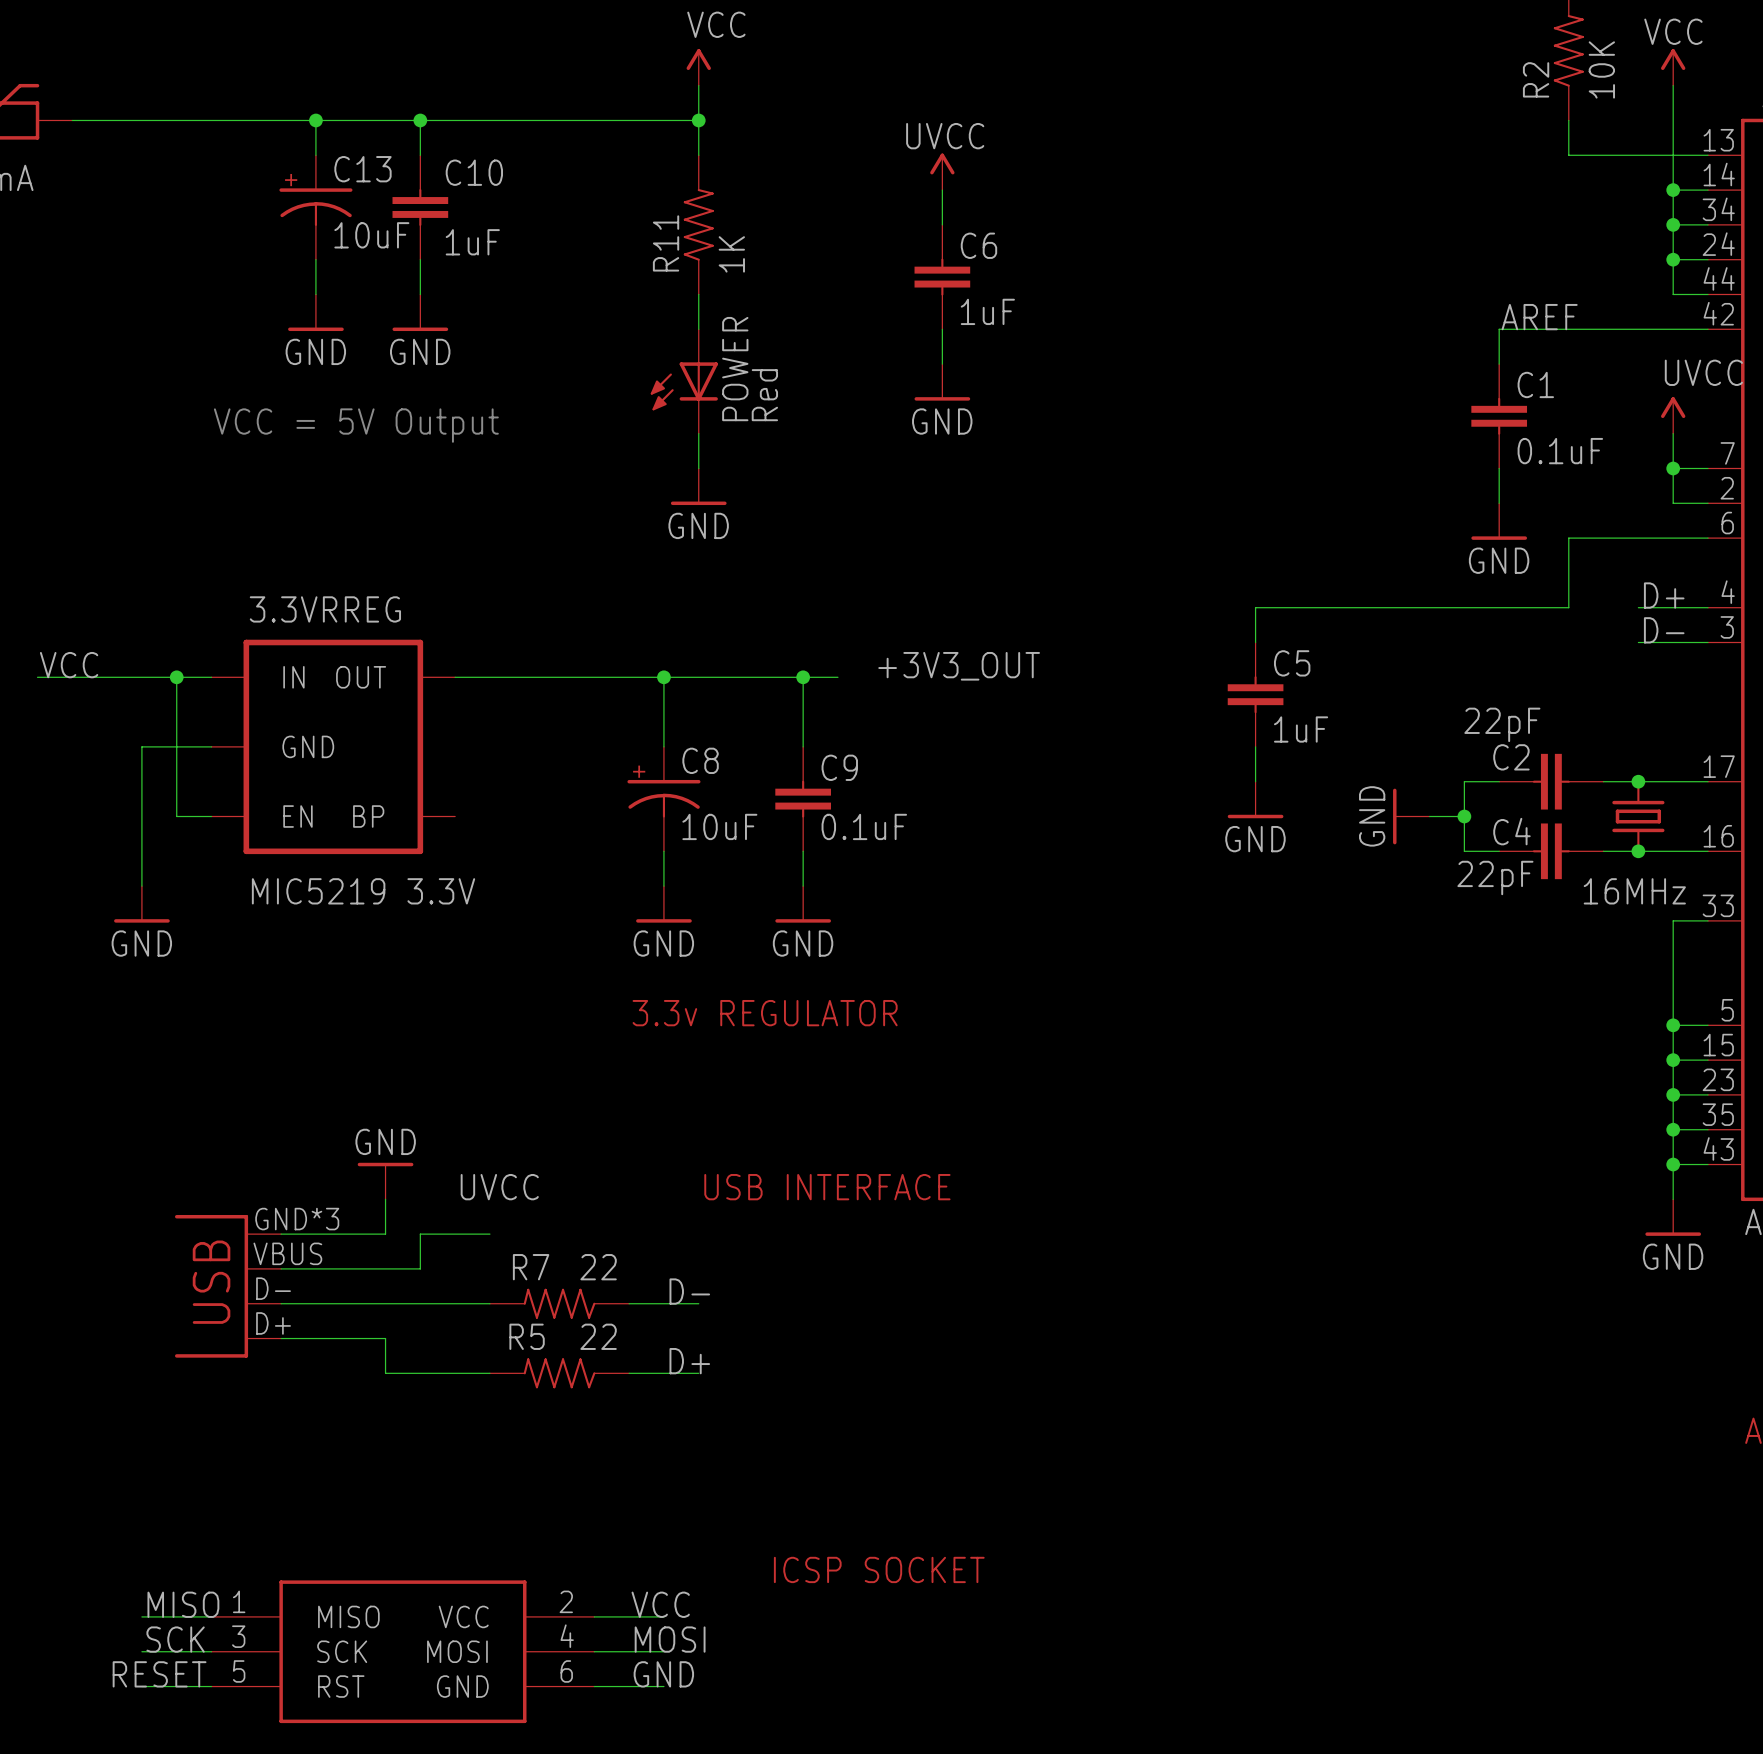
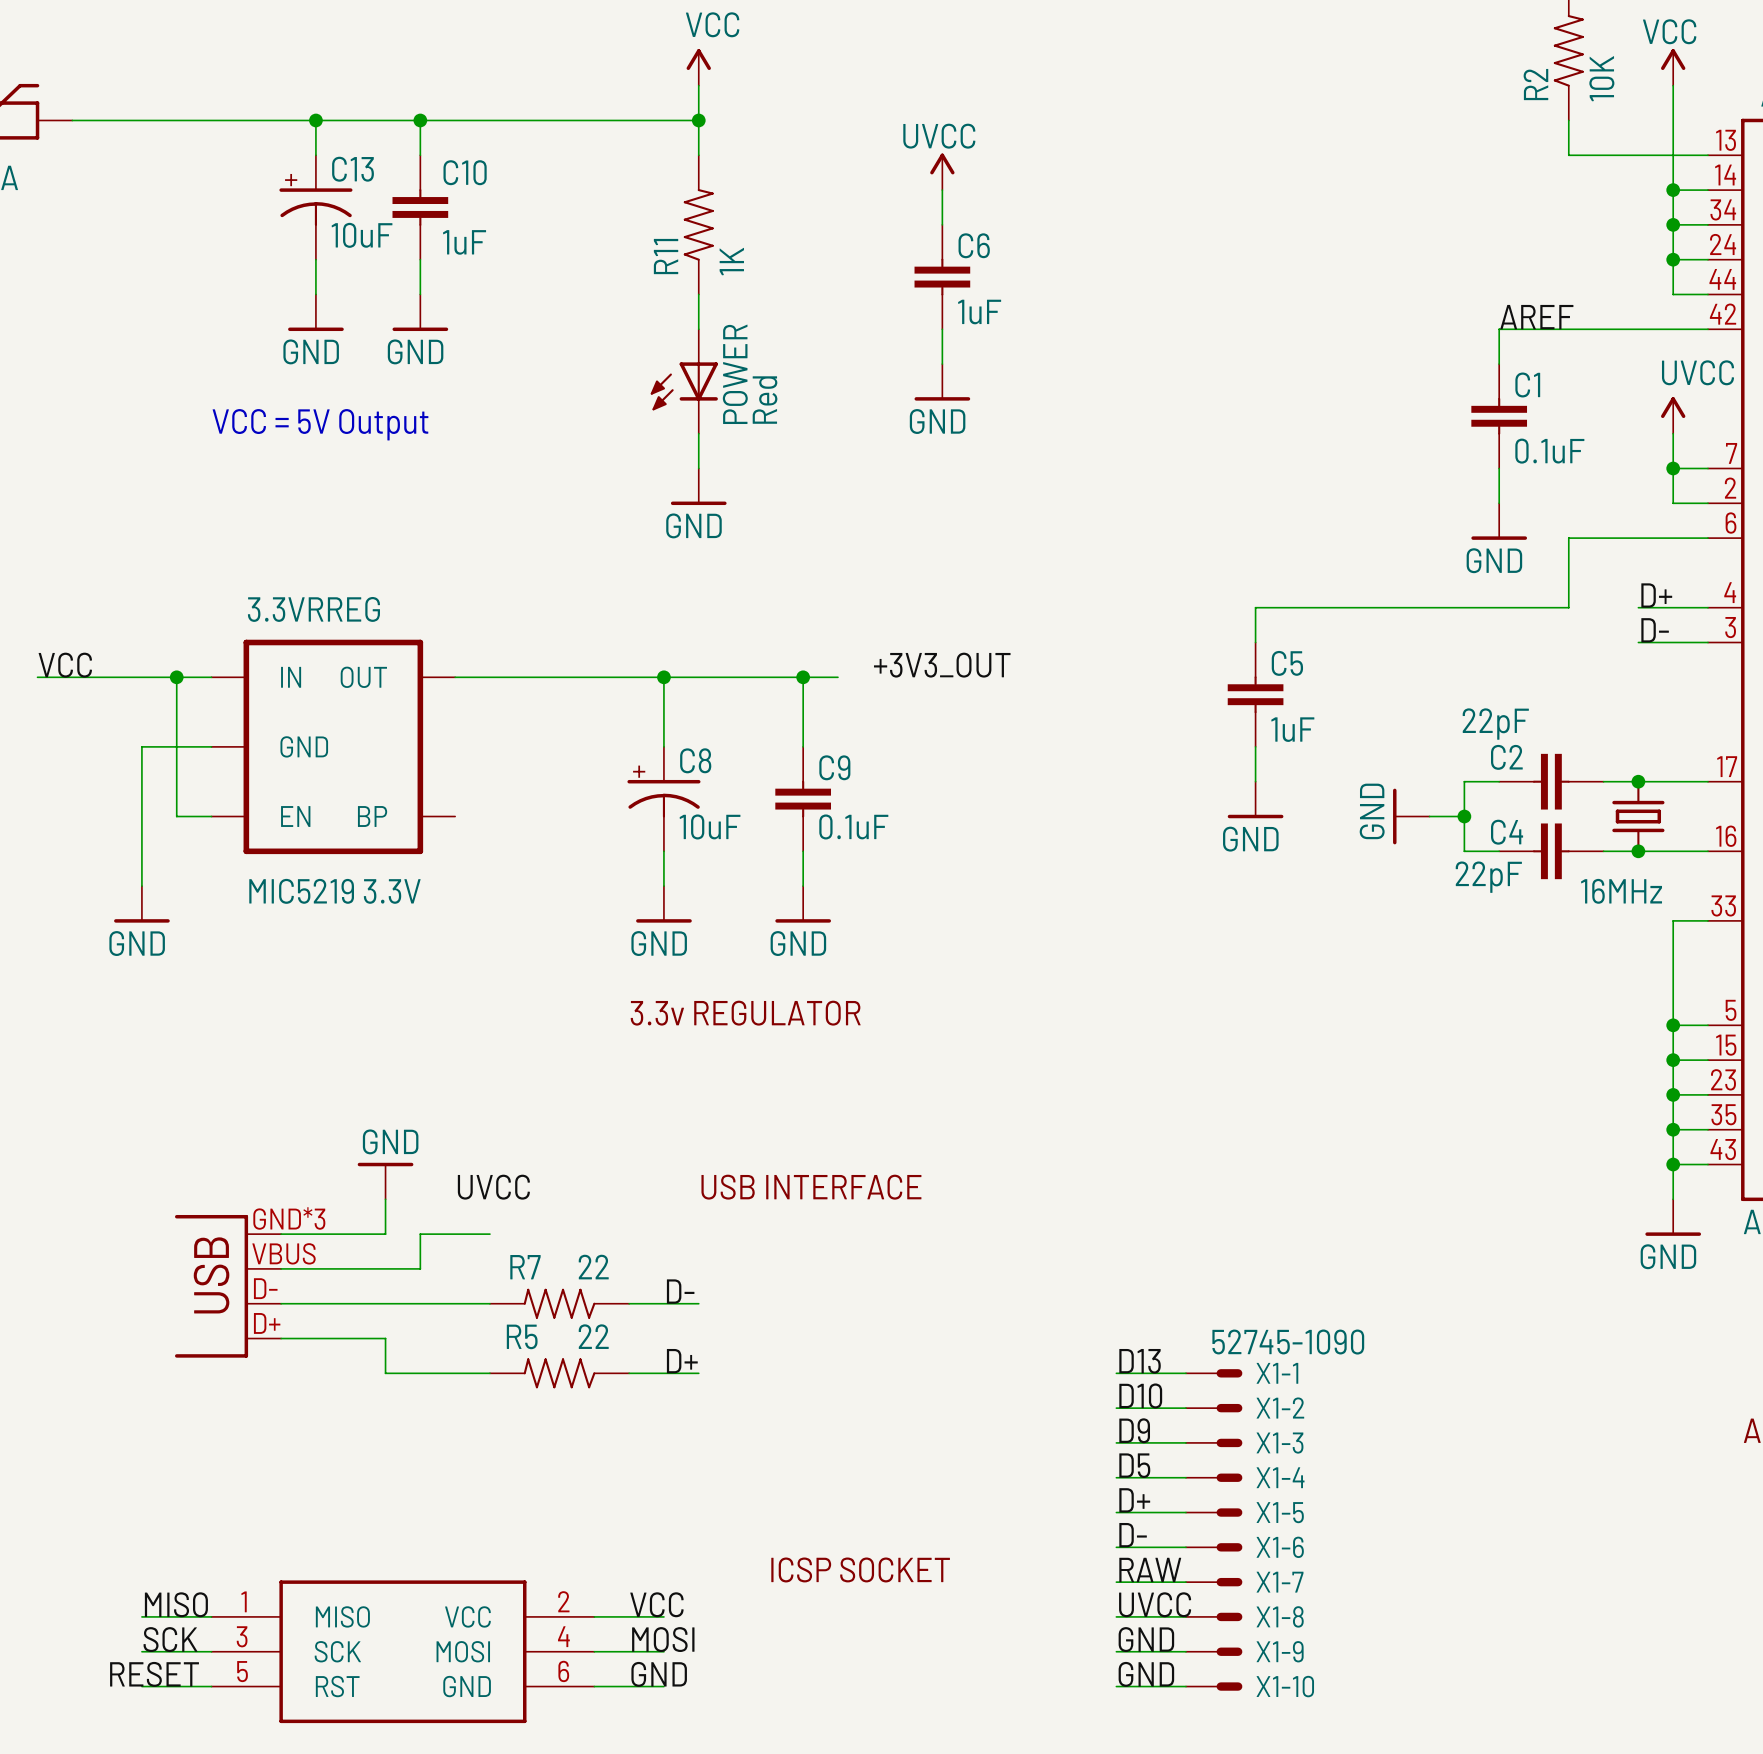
label: none -> D13 (1140, 1361)
wire: none -> (1116, 1373) (1185, 1373)
X1-1: none -> 52745-1090 (1214, 1373)
label: none -> D10 (1140, 1395)
wire: none -> (1116, 1408) (1185, 1408)
X1-2: none -> (1214, 1408)
label: none -> D9 (1134, 1430)
wire: none -> (1116, 1442) (1185, 1442)
X1-3: none -> (1214, 1442)
label: none -> D5 (1134, 1465)
wire: none -> (1116, 1477) (1185, 1477)
X1-4: none -> (1214, 1477)
label: none -> D+ (1134, 1500)
wire: none -> (1116, 1512) (1185, 1512)
X1-5: none -> (1214, 1512)
label: none -> D- (1133, 1535)
wire: none -> (1116, 1547) (1185, 1547)
X1-6: none -> (1214, 1547)
label: none -> RAW (1150, 1569)
wire: none -> (1116, 1582) (1185, 1582)
X1-7: none -> (1214, 1582)
label: none -> UVCC (1155, 1604)
wire: none -> (1116, 1616) (1185, 1616)
X1-8: none -> (1214, 1616)
label: none -> GND (1146, 1639)
wire: none -> (1116, 1651) (1185, 1651)
X1-9: none -> (1214, 1651)
label: none -> GND (1146, 1674)
wire: none -> (1116, 1686) (1185, 1686)
X1-10: none -> (1214, 1686)

